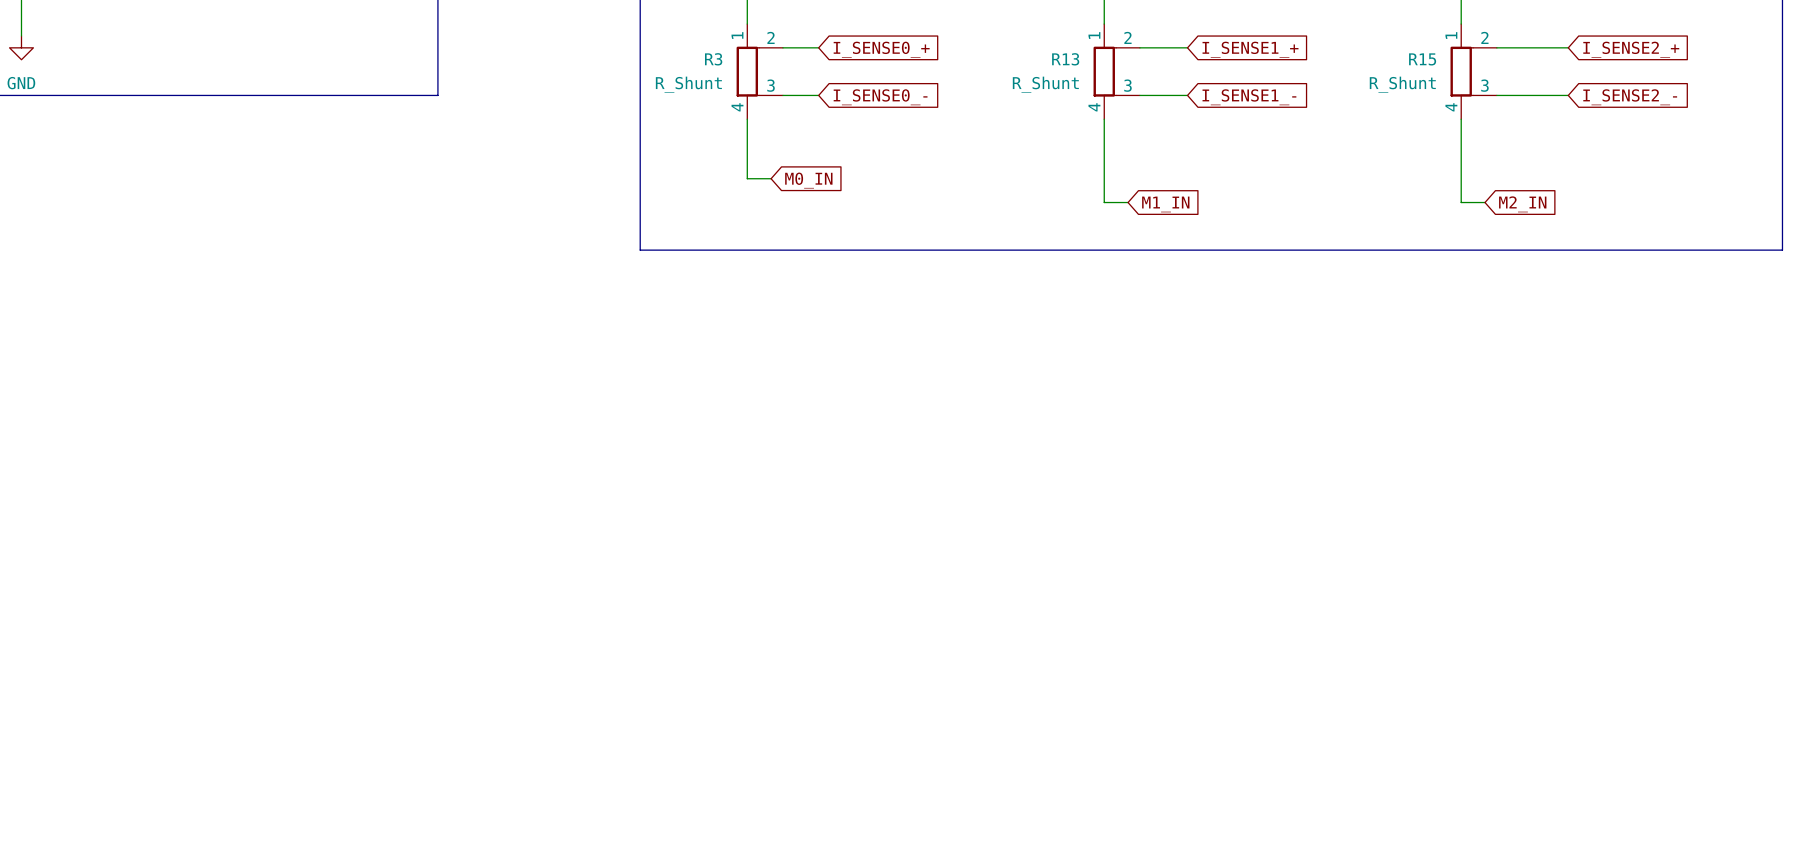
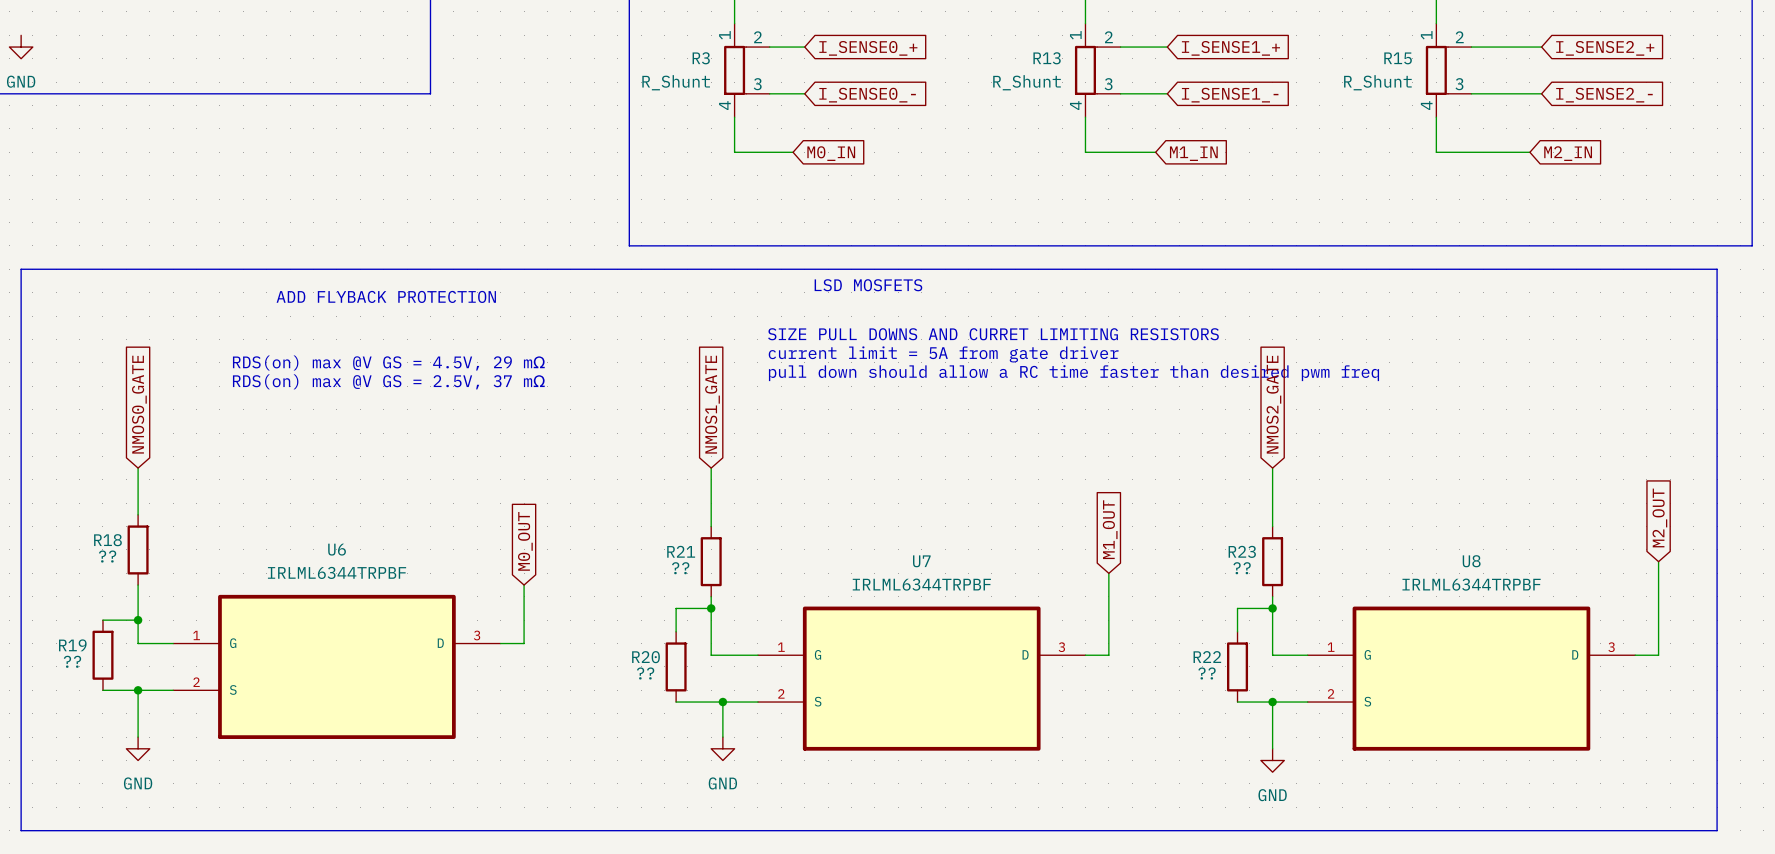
wire: (21, 0) (21, 35) -> none
wire: (747, 154) (747, 178) (771, 178) -> (734, 152) (793, 152)
wire: (1104, 154) (1104, 202) (1128, 202) -> (1085, 152) (1155, 152)
wire: (1461, 154) (1461, 202) (1485, 202) -> (1436, 152) (1529, 152)
global label position: M0_IN (808, 180) -> M0_IN (831, 153)
global label position: M1_IN (1165, 204) -> M1_IN (1193, 153)
global label position: M2_IN (1522, 204) -> M2_IN (1568, 153)
line: none -> (21, 269) (1717, 269) (1717, 830) (21, 830) (21, 269)
text: none -> LSD MOSFETS (868, 285)
text: none -> ADD FLYBACK PROTECTION (386, 296)
text: none -> SIZE PULL DOWNS AND CURRET LIMITING RESISTORS (993, 334)
text: none -> current limit = 5A from gate driver (943, 354)
text: none -> RDS(on) max @V GS = 4.5V, 29 mΩ (388, 363)
text: none -> pull down should allow a RC time faster than desired pwm freq (1073, 373)
text: none -> RDS(on) max @V GS = 2.5V, 37 mΩ (388, 381)
global label: none -> NMOS0_GATE (139, 404)
global label: none -> NMOS1_GATE (712, 404)
global label: none -> NMOS2_GATE (1273, 404)
wire: none -> (138, 468) (138, 514)
wire: none -> (711, 468) (711, 526)
wire: none -> (1272, 468) (1272, 526)
global label: none -> M2_OUT (1659, 517)
global label: none -> M1_OUT (1110, 529)
global label: none -> M0_OUT (525, 541)
R18: none -> ?? (138, 549)
R21: none -> ?? (711, 561)
R23: none -> ?? (1272, 561)
wire: none -> (1658, 561) (1658, 655) (1635, 655)
wire: none -> (1108, 573) (1108, 655) (1085, 655)
wire: none -> (138, 585) (138, 643) (173, 643)
wire: none -> (524, 585) (524, 643) (500, 643)
wire: none -> (711, 596) (711, 655) (757, 655)
wire: none -> (1272, 596) (1272, 655) (1307, 655)
wire: none -> (711, 608) (676, 608) (676, 631)
junction: none -> (711, 608)
wire: none -> (1272, 608) (1237, 608) (1237, 631)
junction: none -> (1272, 608)
wire: none -> (102, 620) (138, 620)
junction: none -> (138, 620)
R19: none -> ?? (102, 655)
U6: none -> IRLML6344TRPBF (336, 666)
R20: none -> ?? (676, 666)
R22: none -> ?? (1237, 666)
U7: none -> IRLML6344TRPBF (921, 678)
U8: none -> IRLML6344TRPBF (1471, 678)
wire: none -> (102, 690) (173, 690)
wire: none -> (138, 690) (138, 737)
junction: none -> (138, 690)
wire: none -> (676, 702) (757, 702)
wire: none -> (722, 702) (722, 737)
junction: none -> (722, 702)
wire: none -> (1237, 702) (1307, 702)
wire: none -> (1272, 702) (1272, 748)
junction: none -> (1272, 702)
power symbol: none -> GND (138, 748)
power symbol: none -> GND (722, 748)
power symbol: none -> GND (1272, 760)

